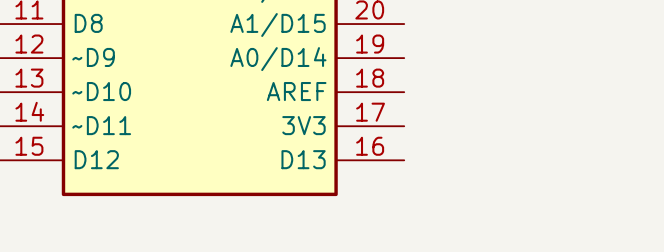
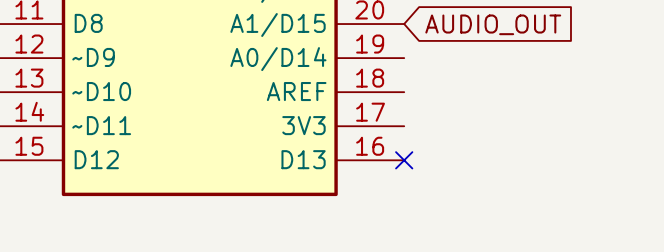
global label: none -> AUDIO_OUT (493, 24)
no-connect mark: none -> (404, 160)

